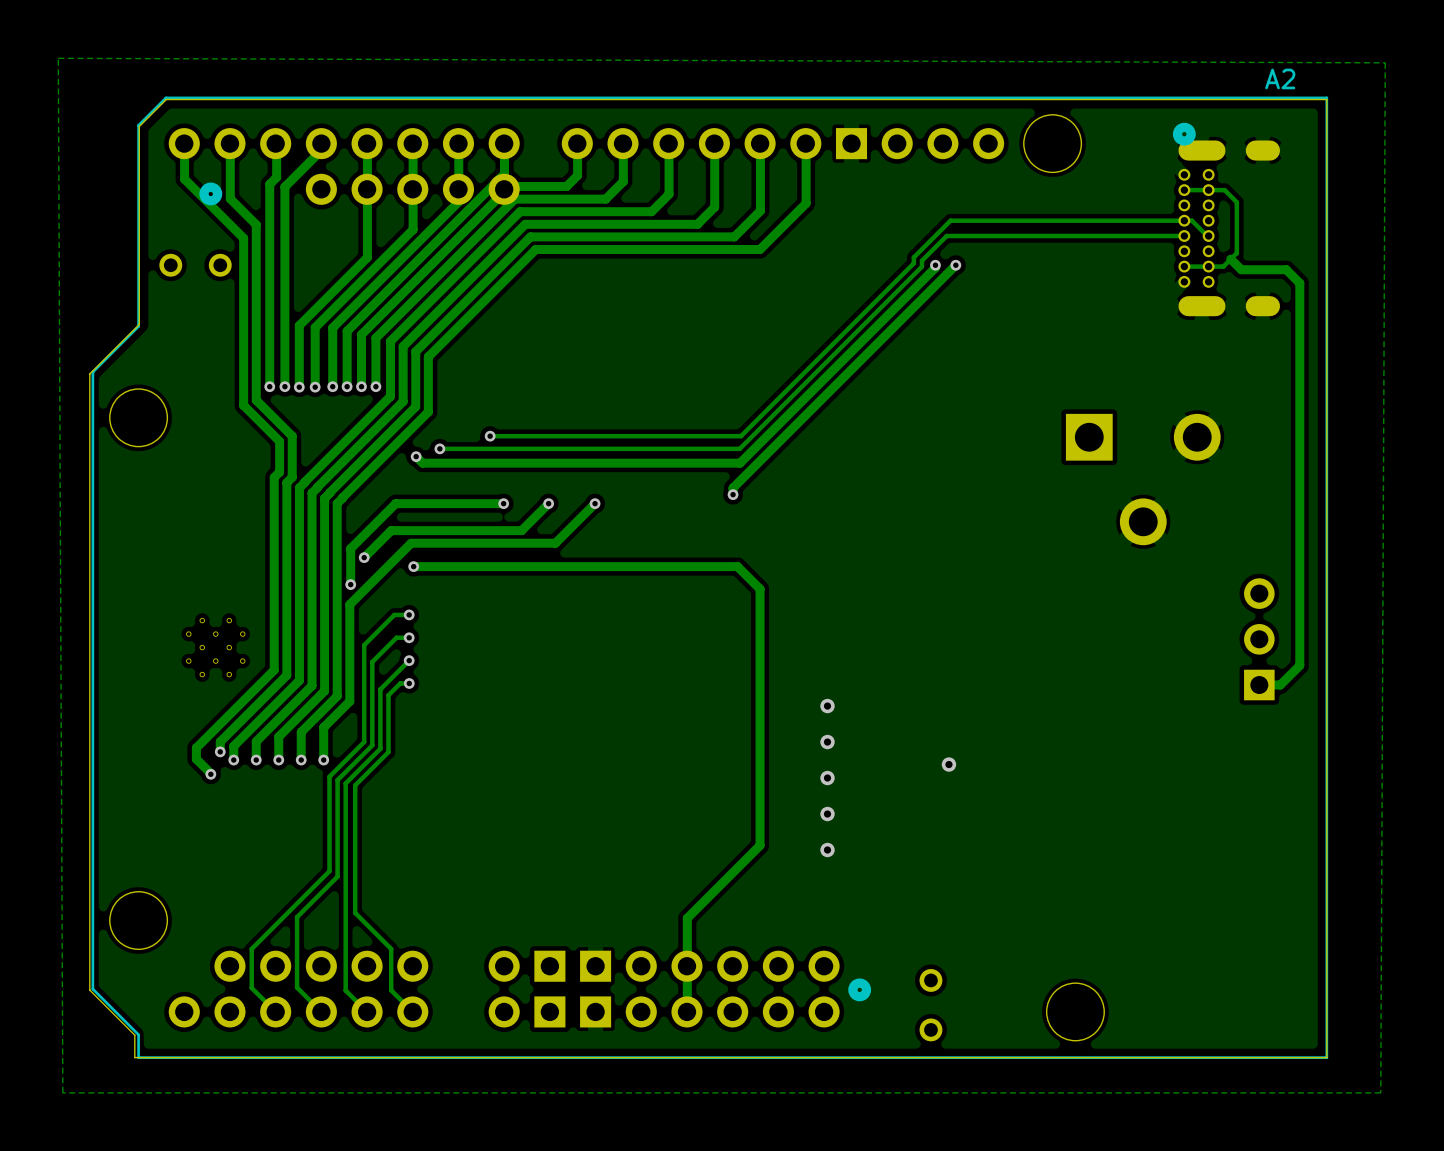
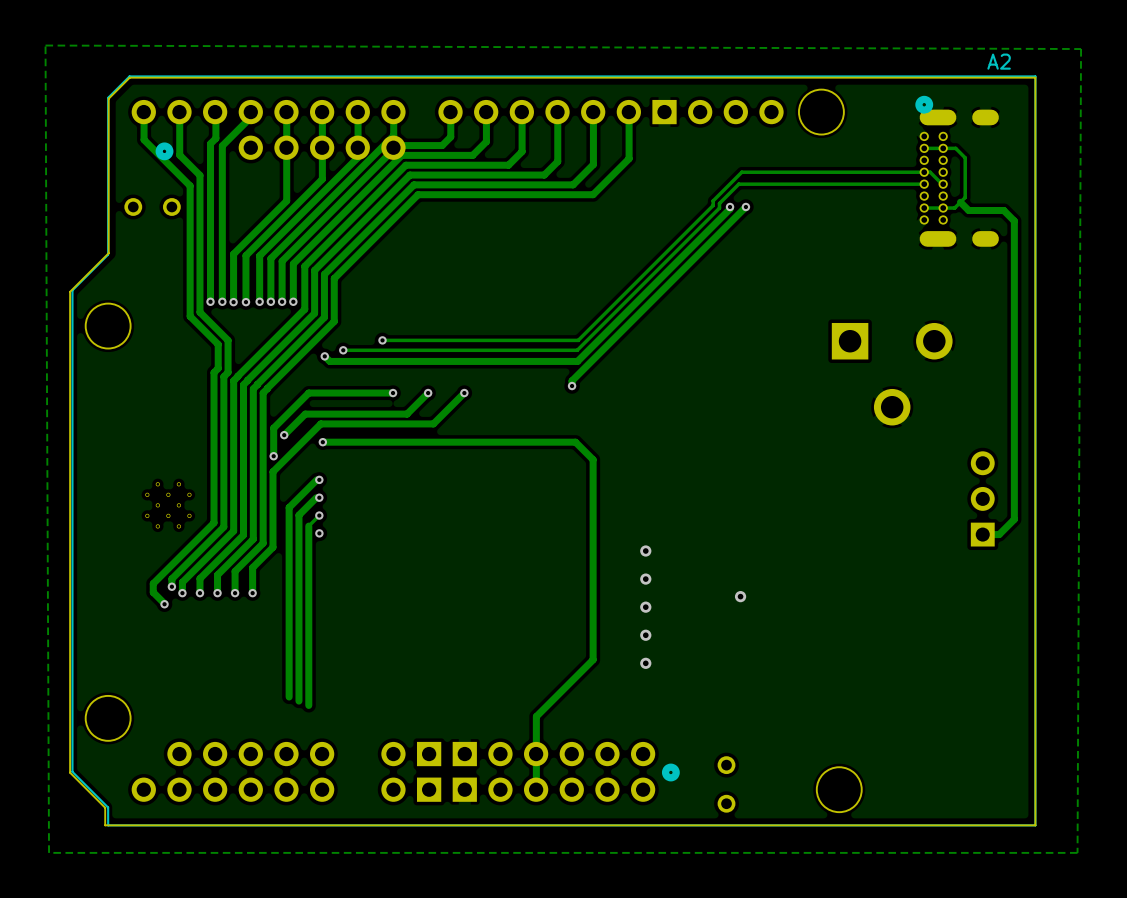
track: (406, 614) (394, 614) (364, 645) (364, 742) (329, 776) (329, 871) (251, 948) (251, 988) (275, 1011) -> (316, 479) (289, 507) (289, 697)
track: (405, 637) (396, 637) (372, 661) (372, 745) (337, 780) (337, 876) (297, 917) (297, 987) (321, 1011) -> (316, 497) (298, 515) (298, 701)
track: (395, 674) (380, 689) (380, 748) (345, 783) (345, 990) (367, 1011) -> (308, 526) (308, 705)
track: (409, 683) (400, 683) (388, 695) (388, 752) (355, 785) (355, 912) (391, 948) (391, 990) (412, 1011) -> none

